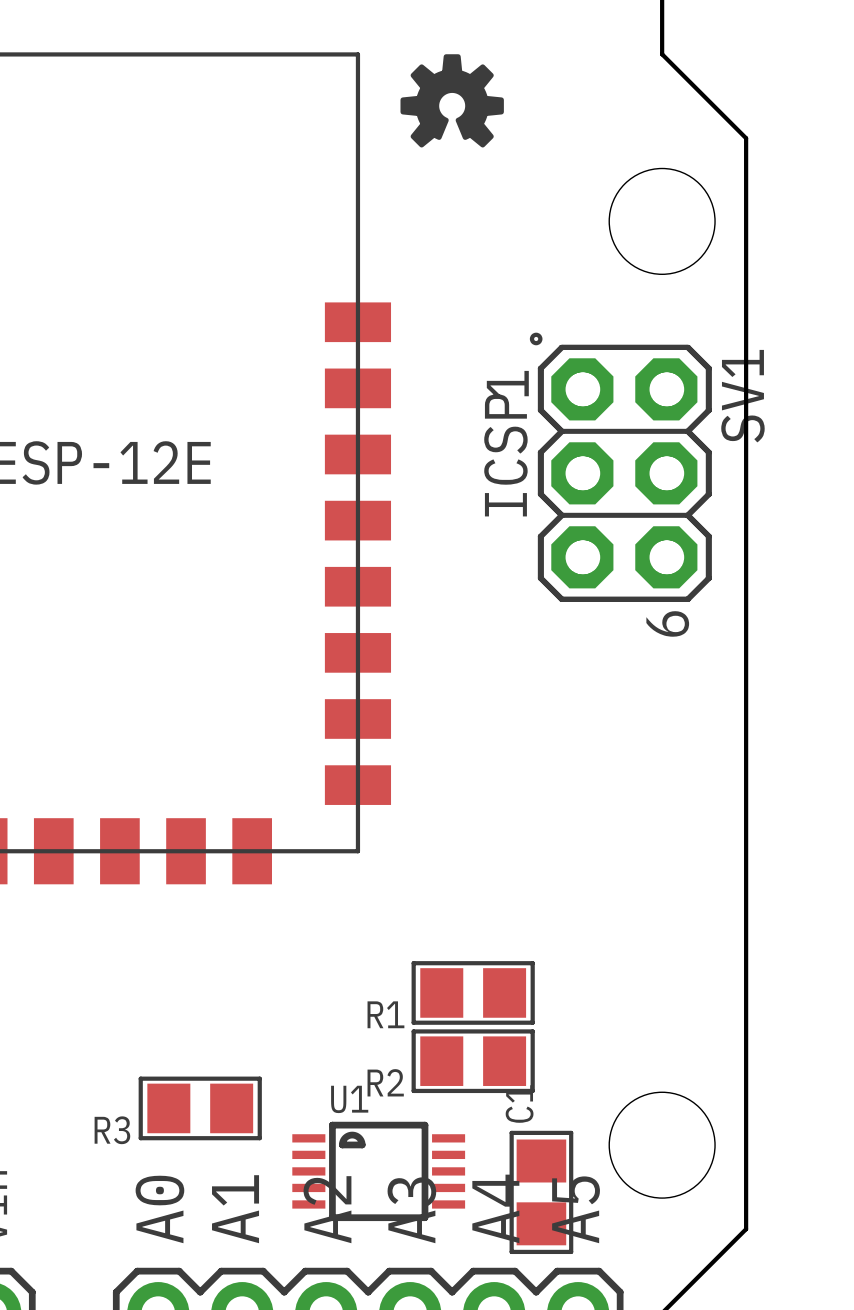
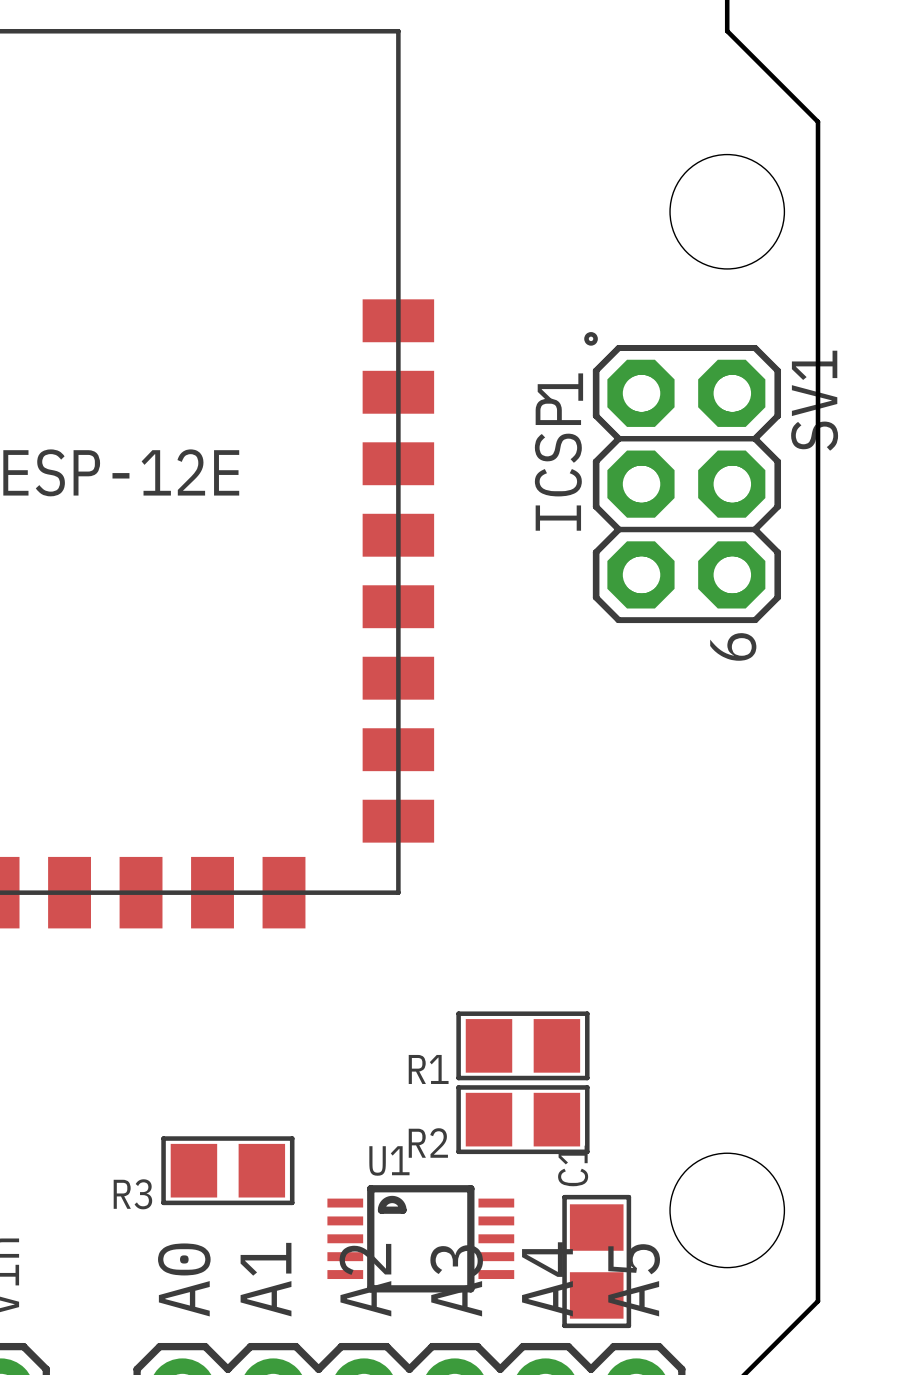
drawing: [400, 54, 504, 148] -> none

